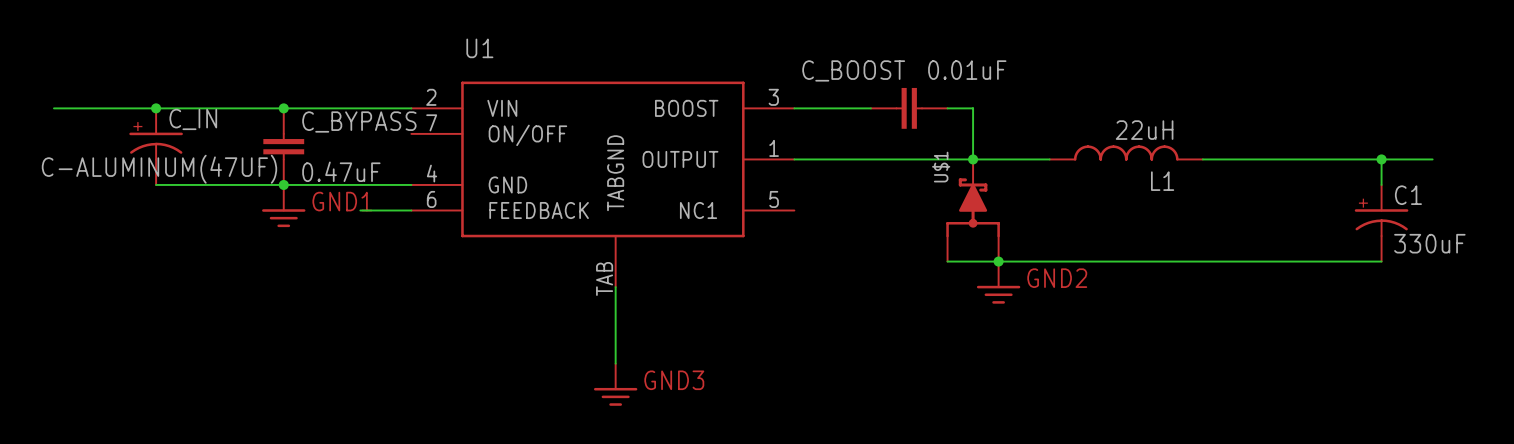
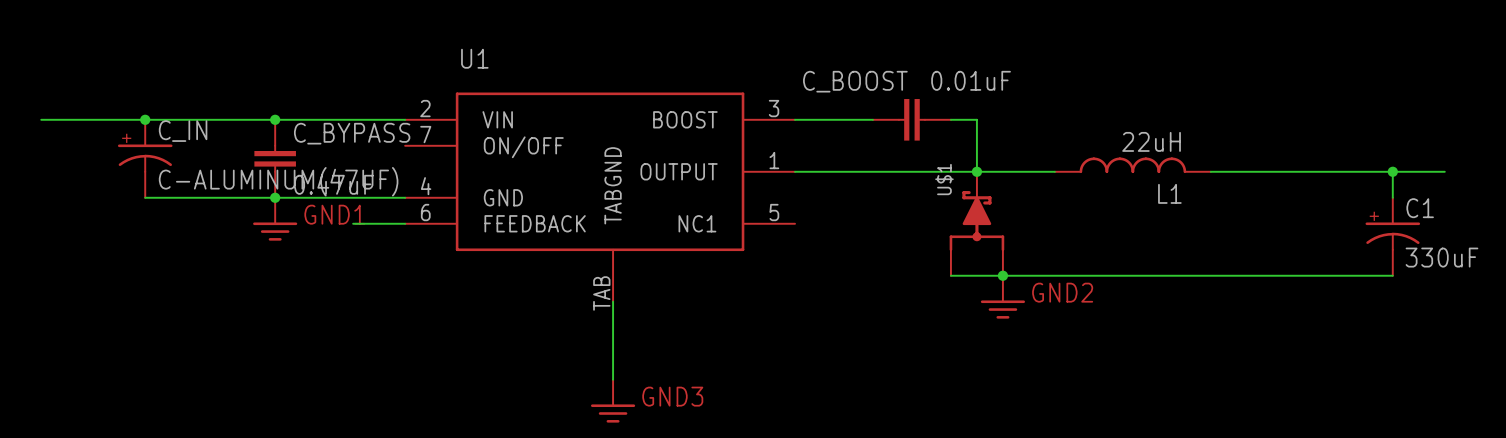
C_IN value position: C-ALUMINUM(47UF) (159, 169) -> C-ALUMINUM(47UF) (278, 181)

